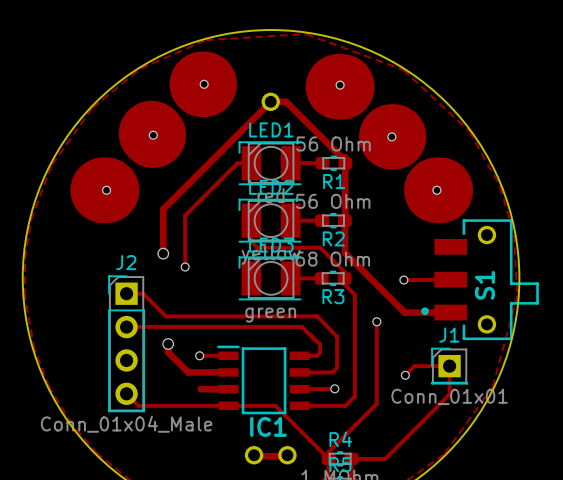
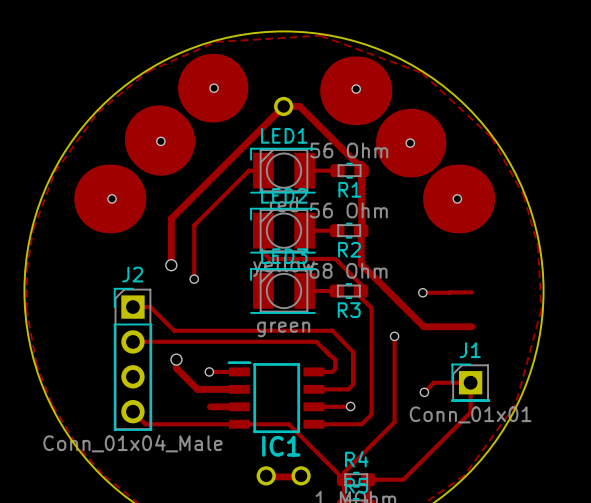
S1: (480, 279) -> none

